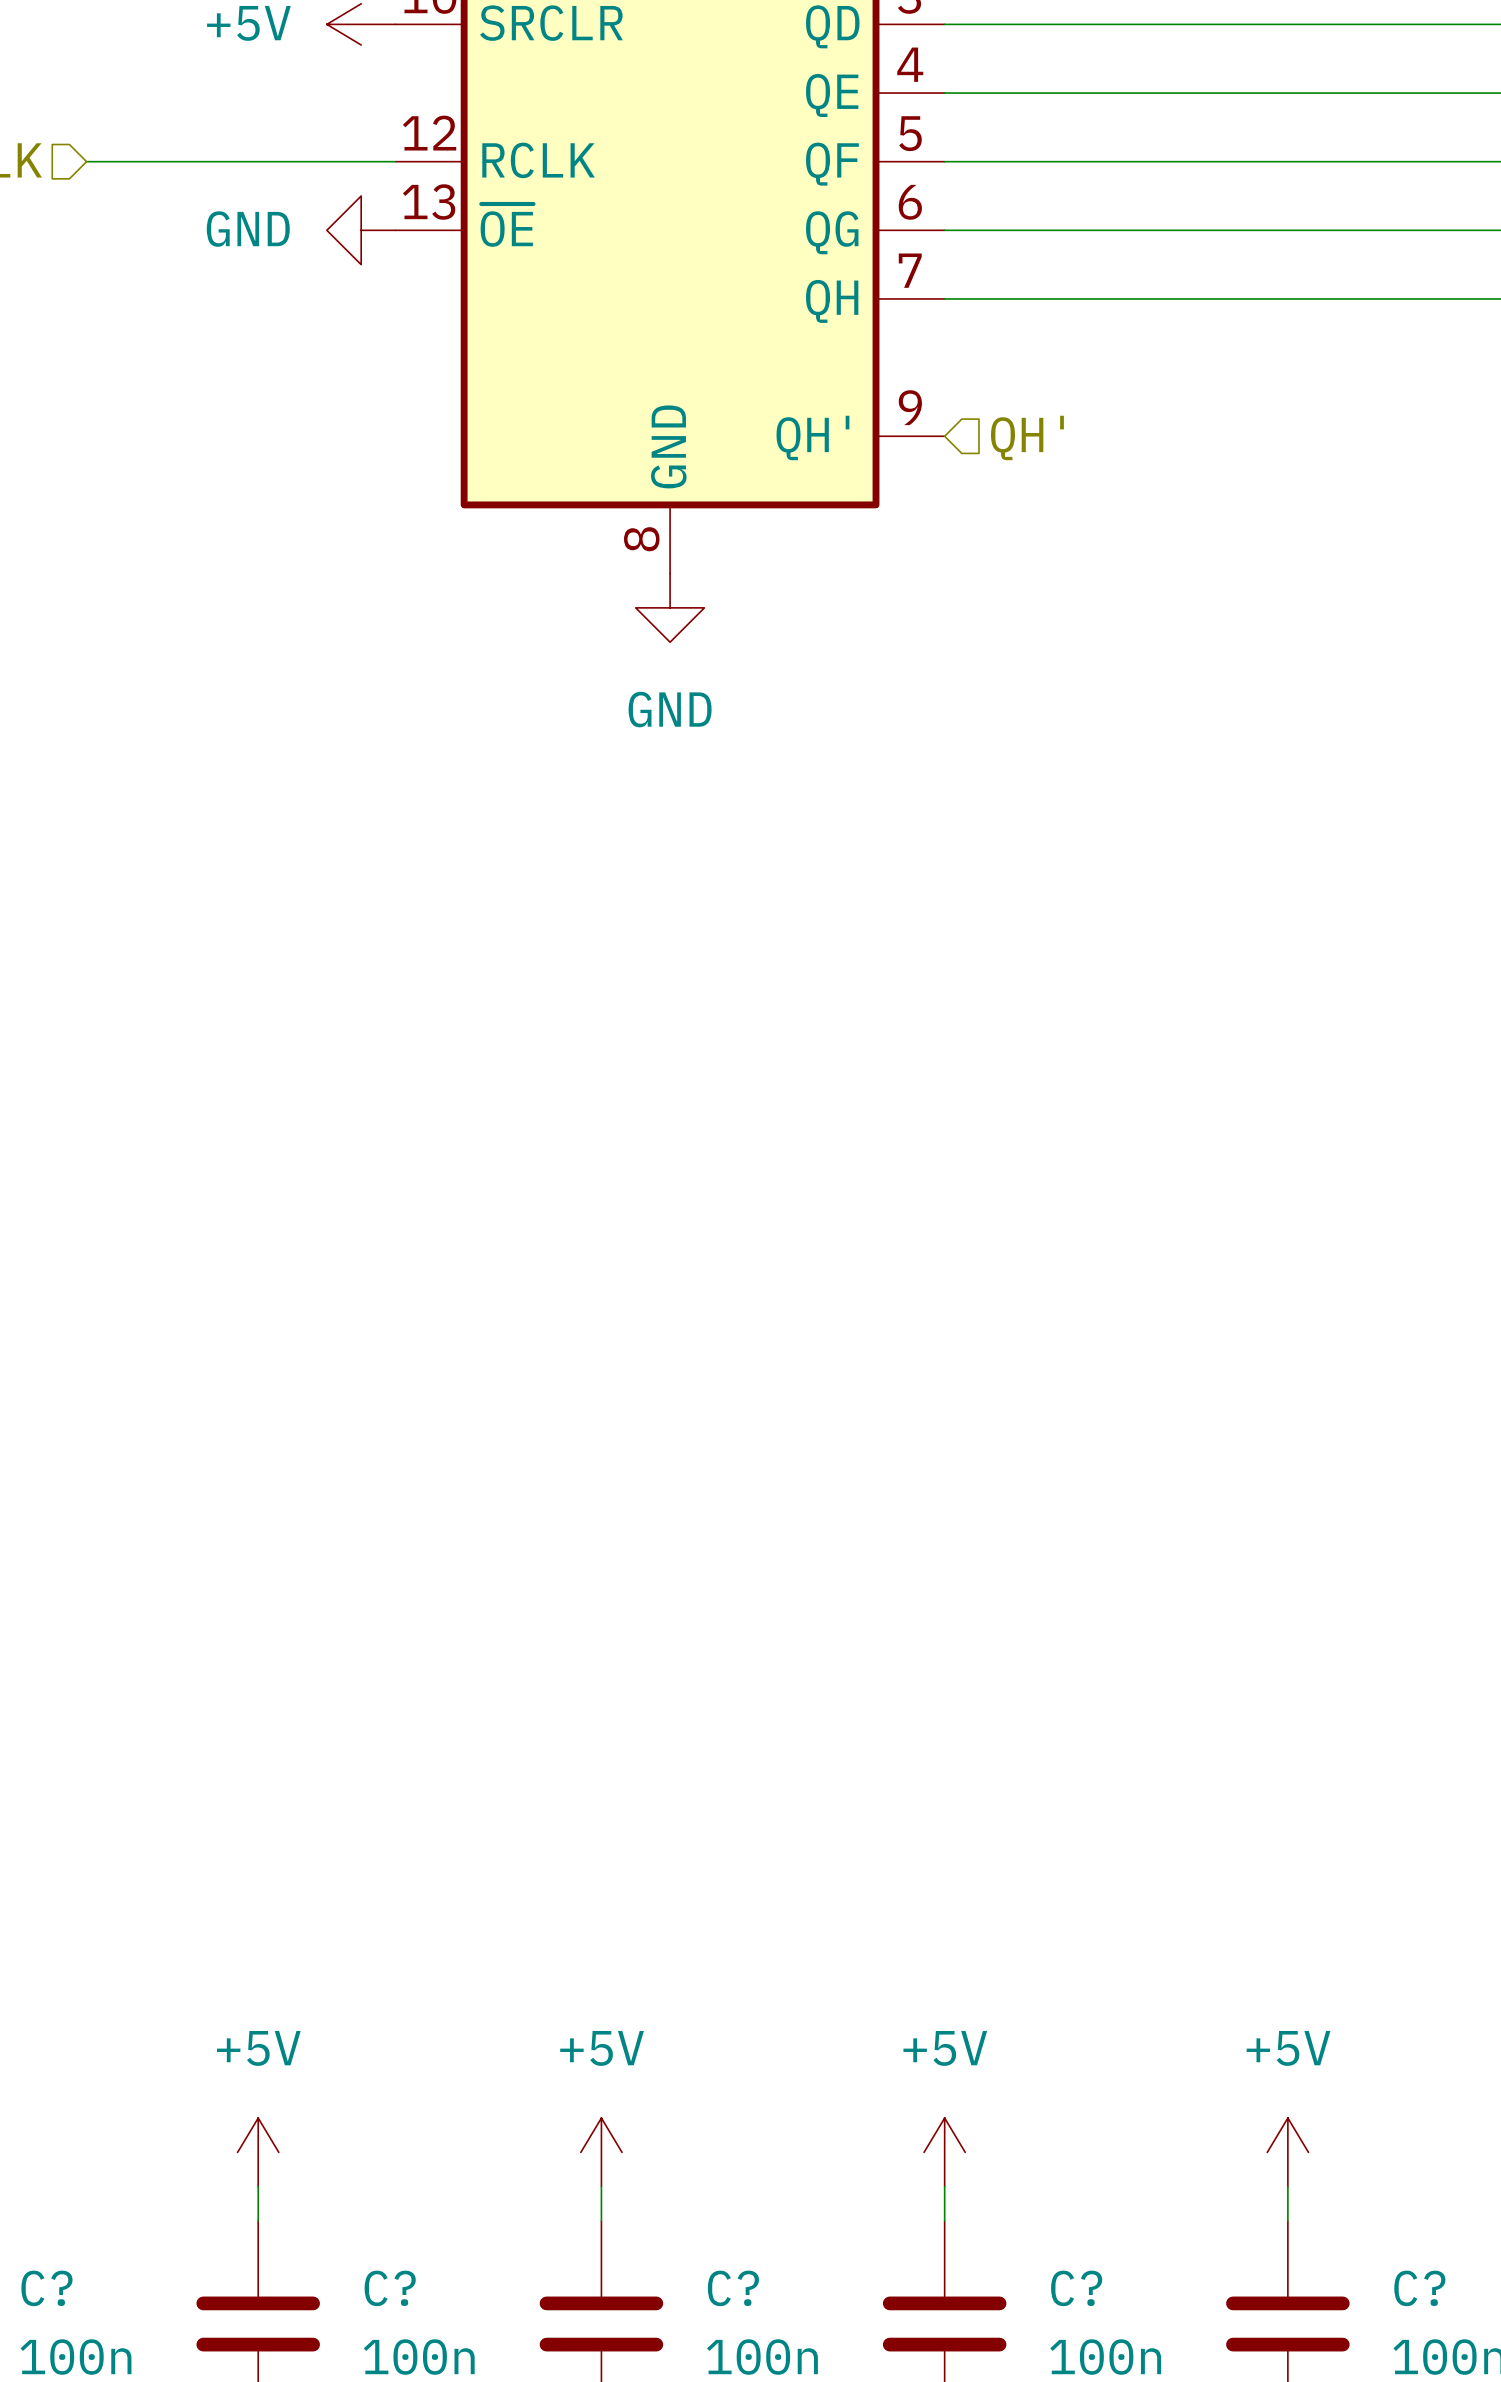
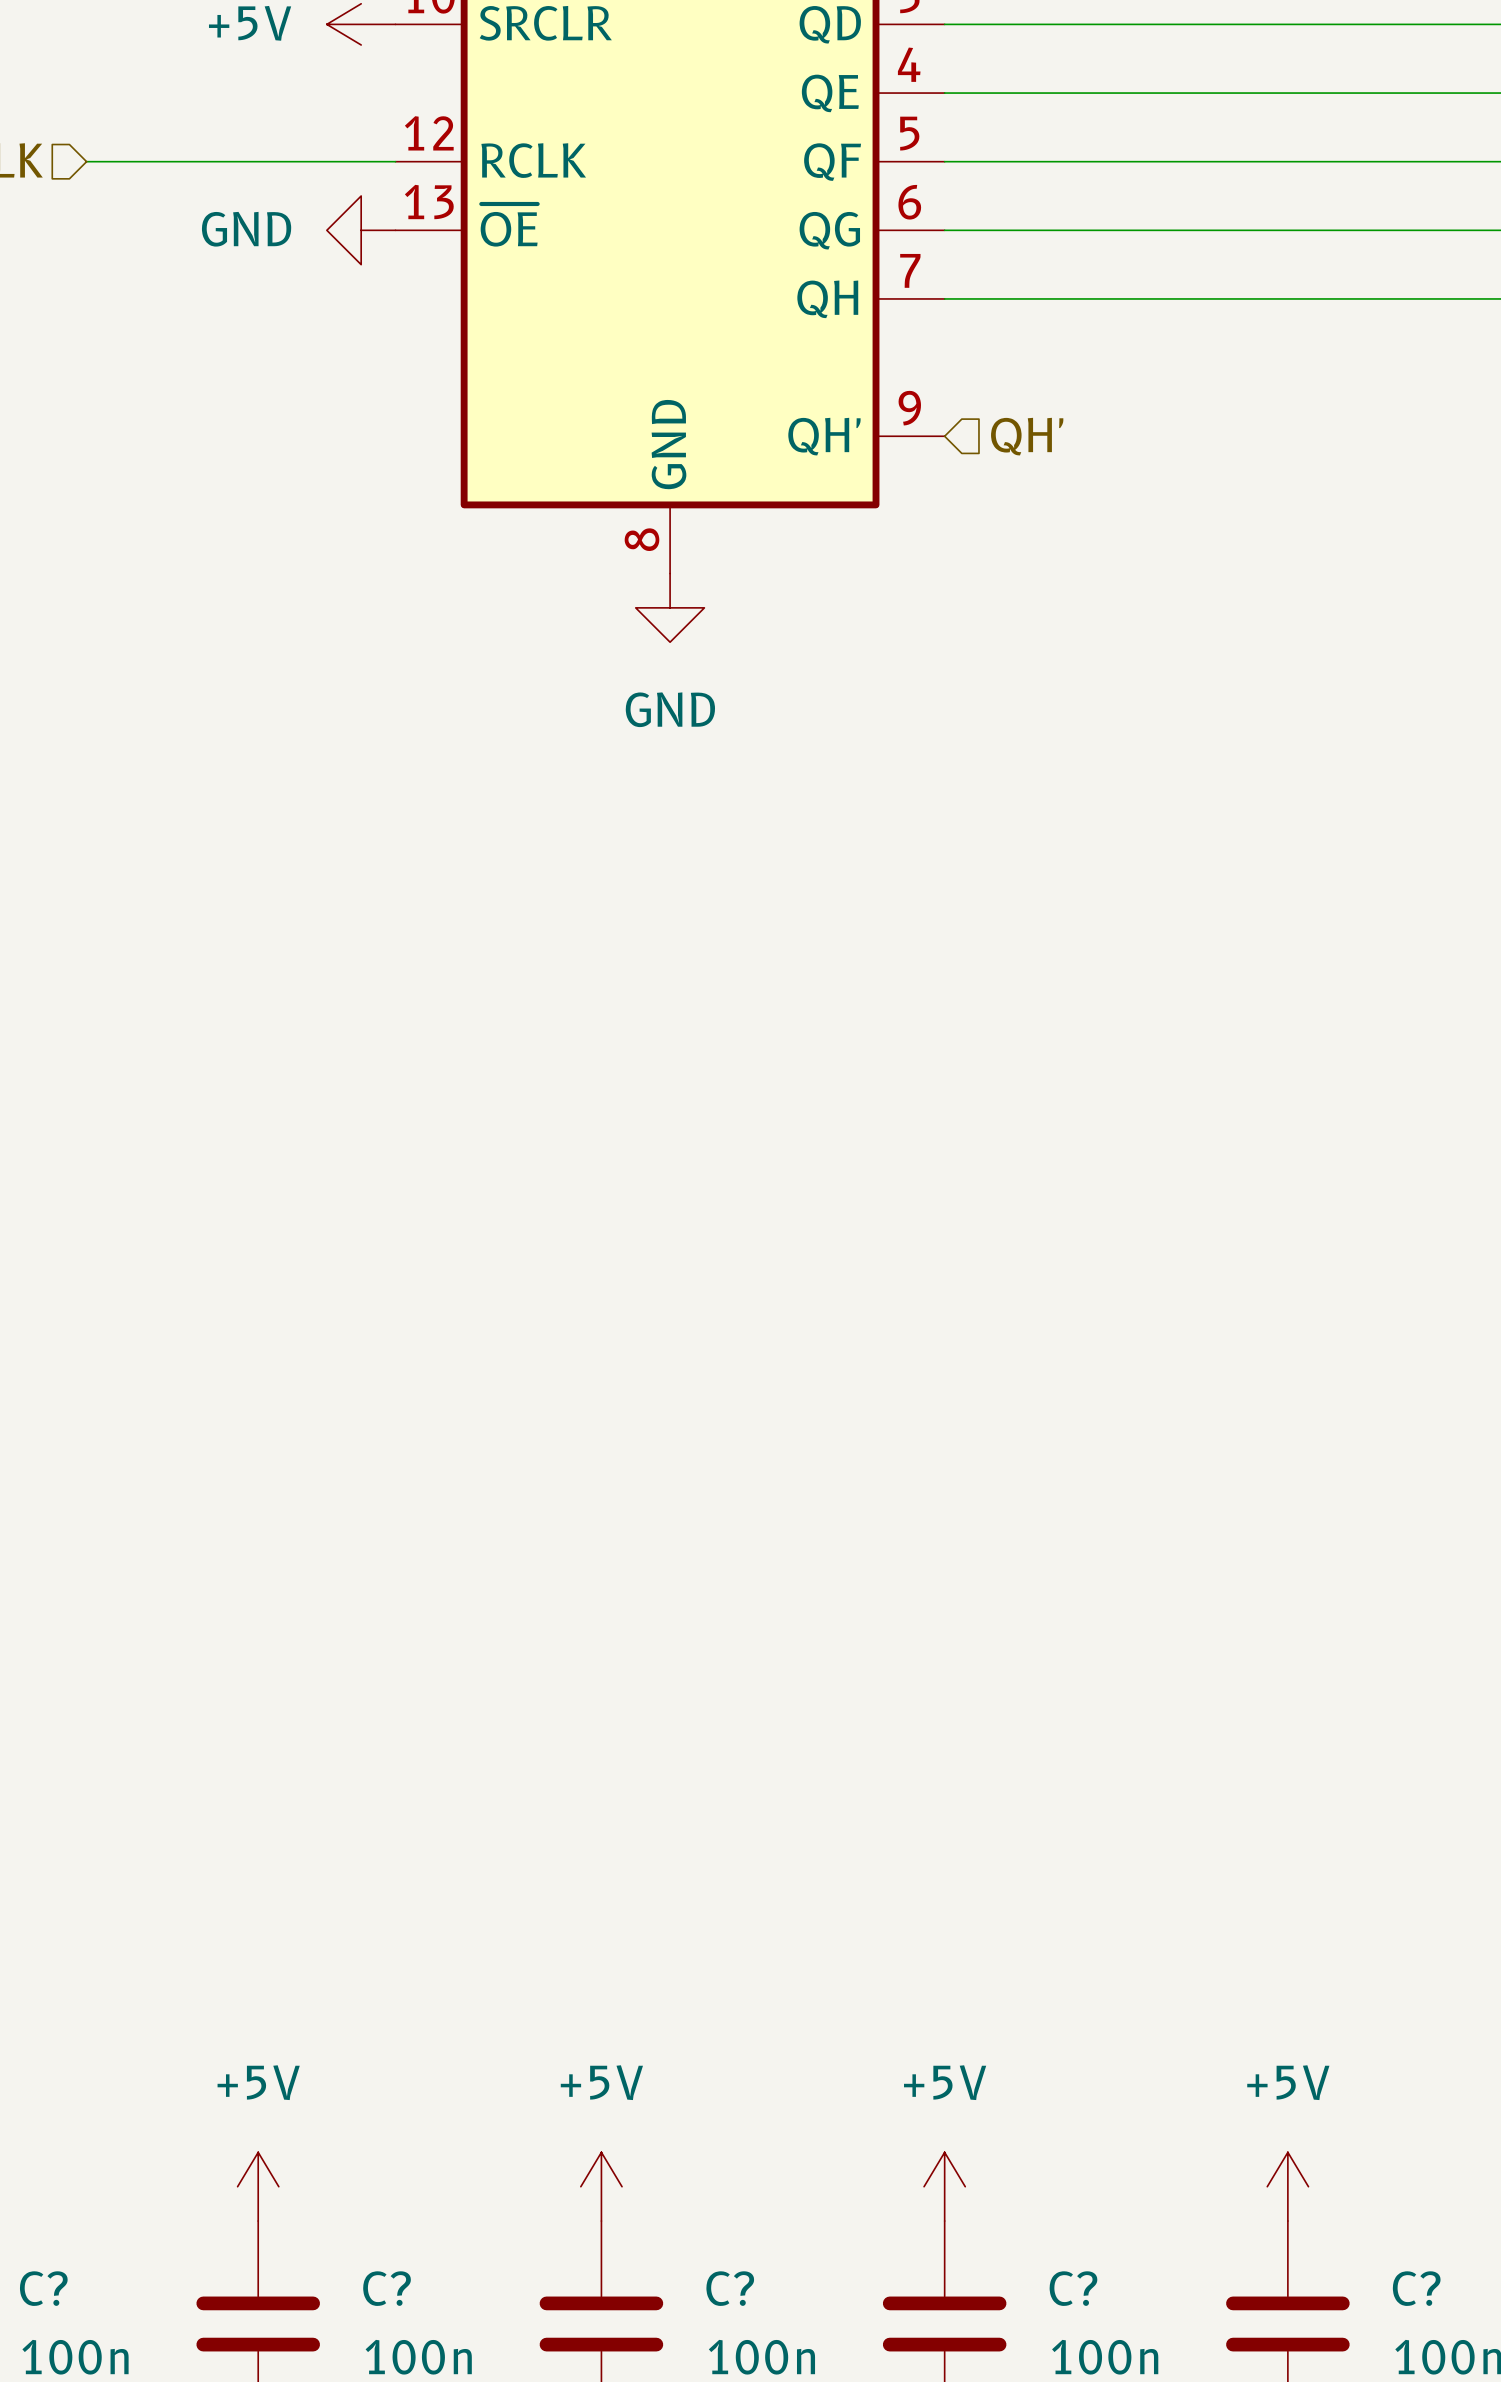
power symbol position: +5V (258, 2152) -> +5V (258, 2186)
power symbol position: +5V (601, 2152) -> +5V (601, 2186)
power symbol position: +5V (944, 2152) -> +5V (944, 2186)
power symbol position: +5V (1287, 2152) -> +5V (1287, 2186)

